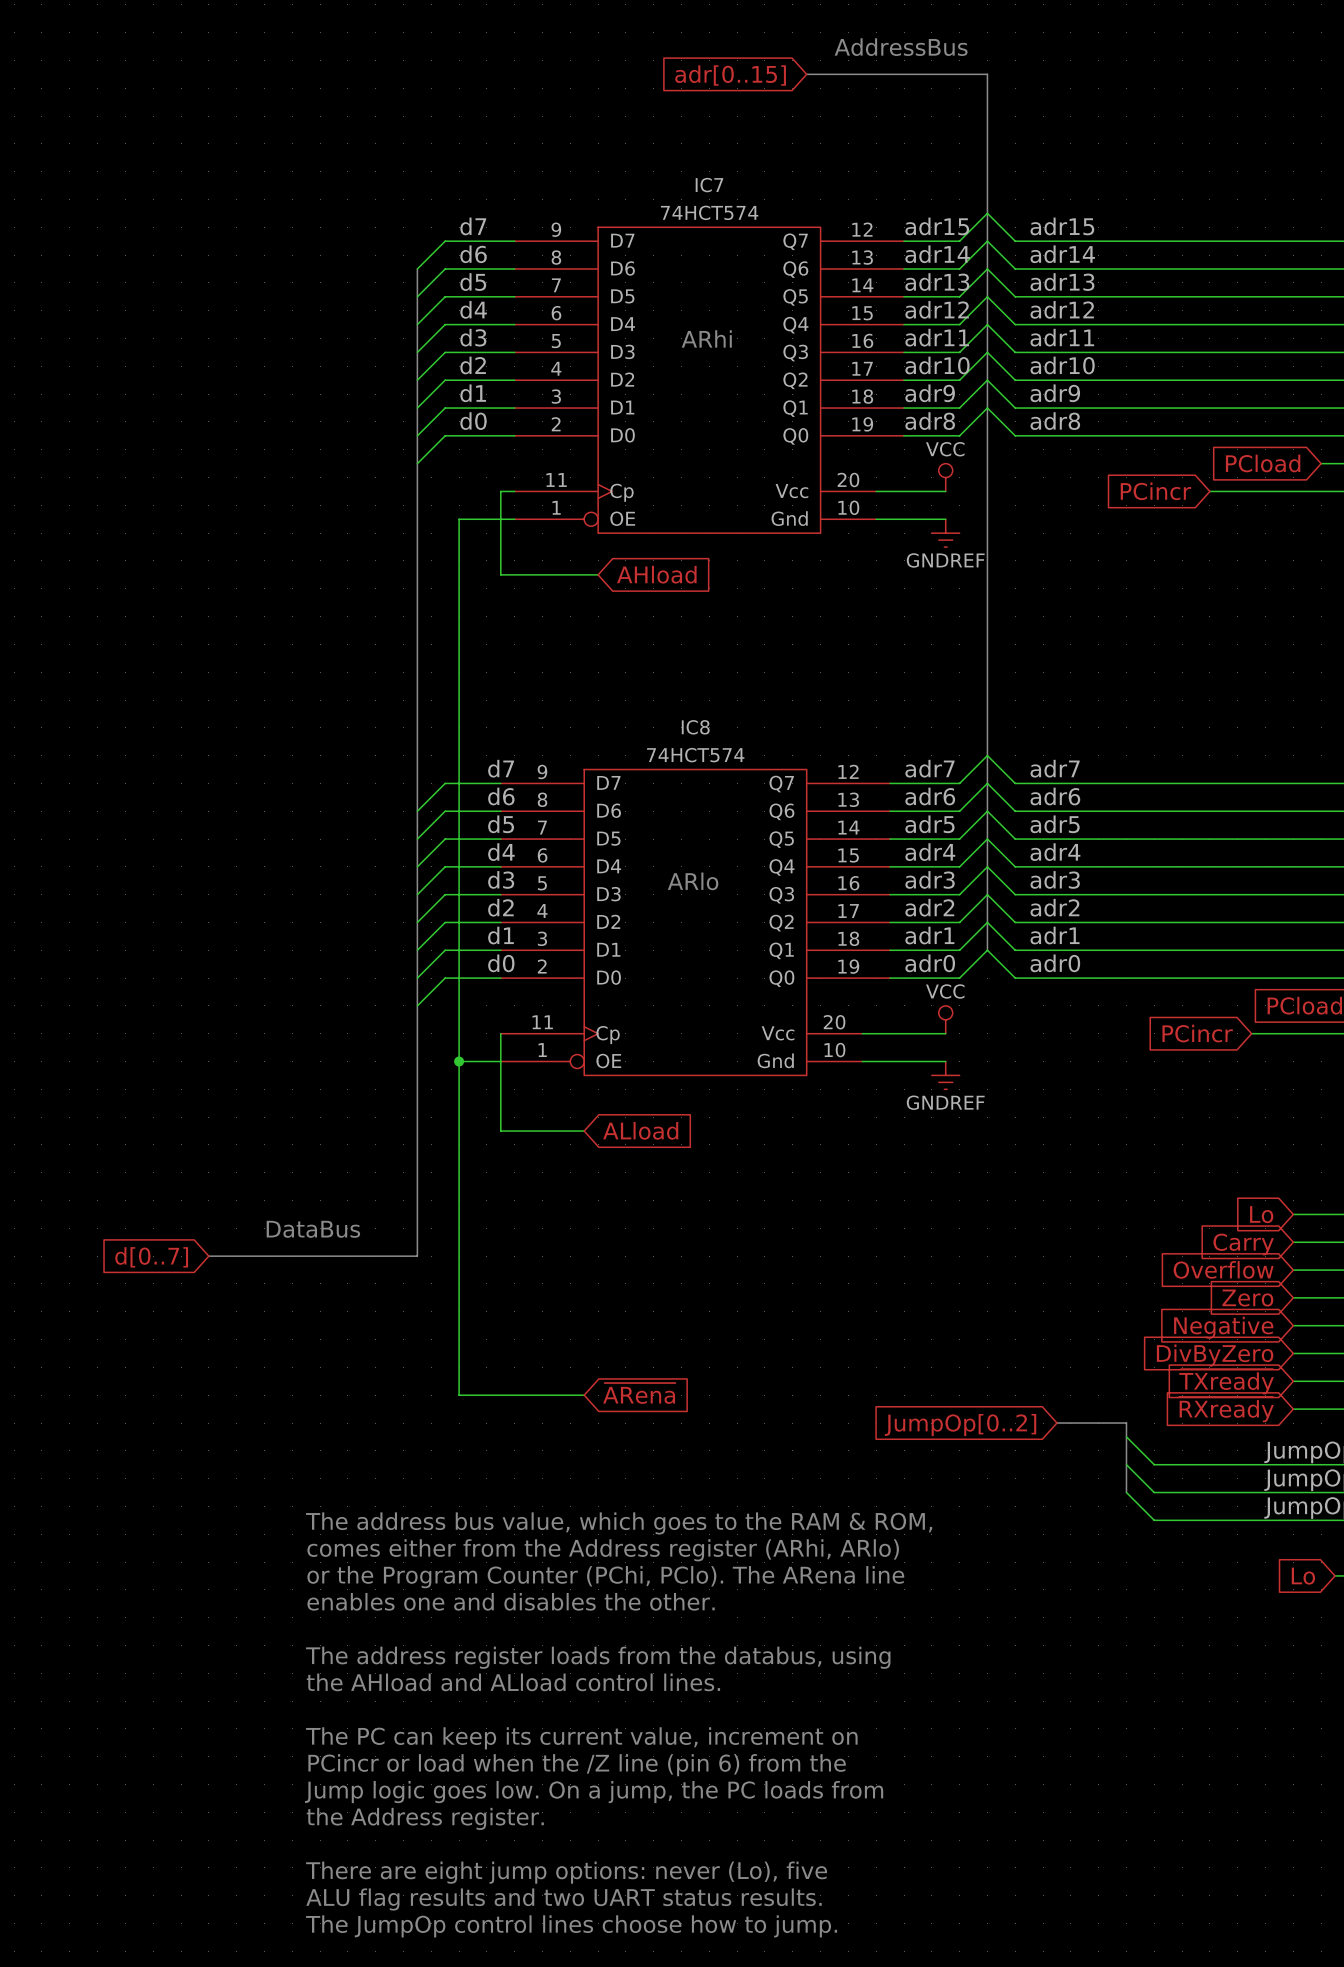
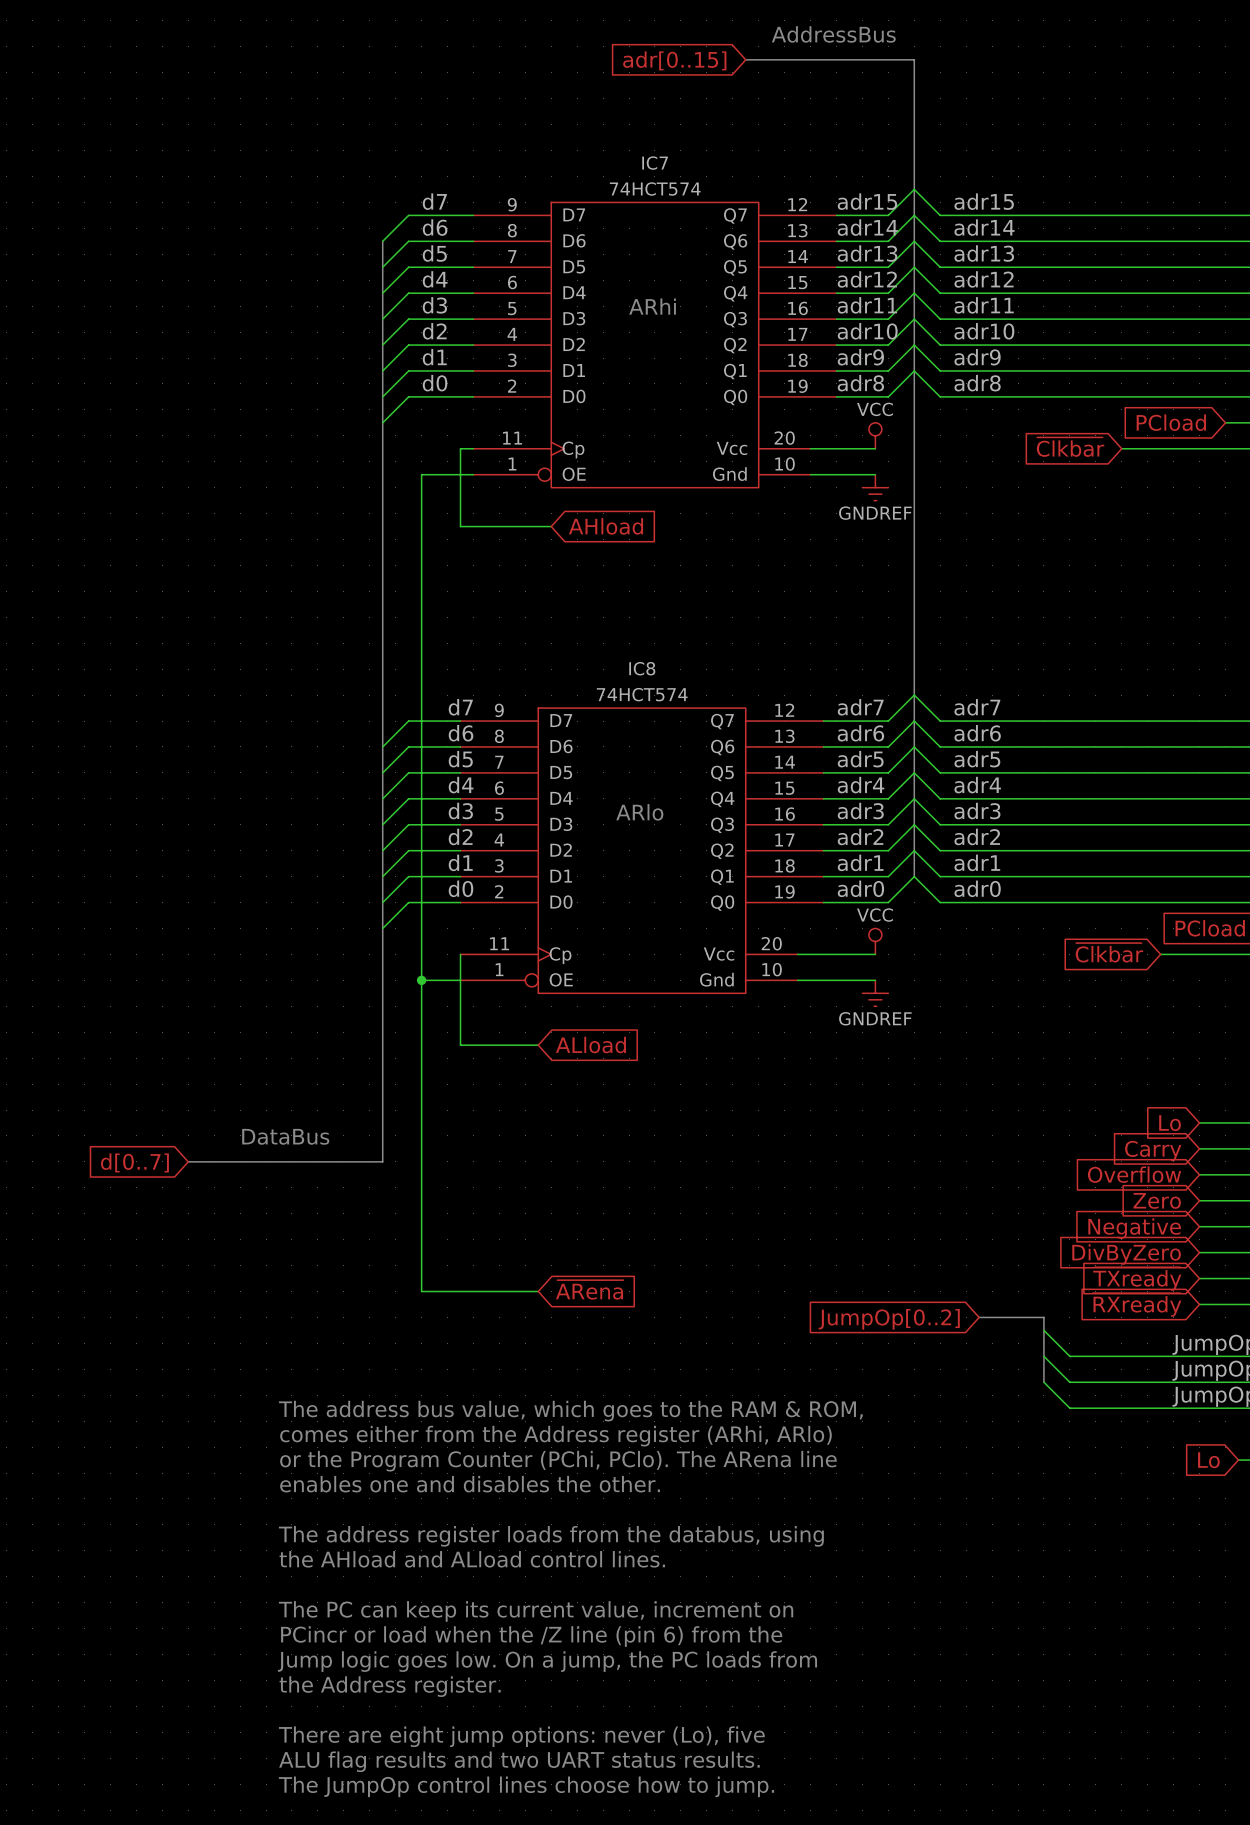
global label: PCincr (1155, 491) -> ~{Clkbar} (1070, 447)
global label: PCincr (1197, 1033) -> ~{Clkbar} (1109, 952)

